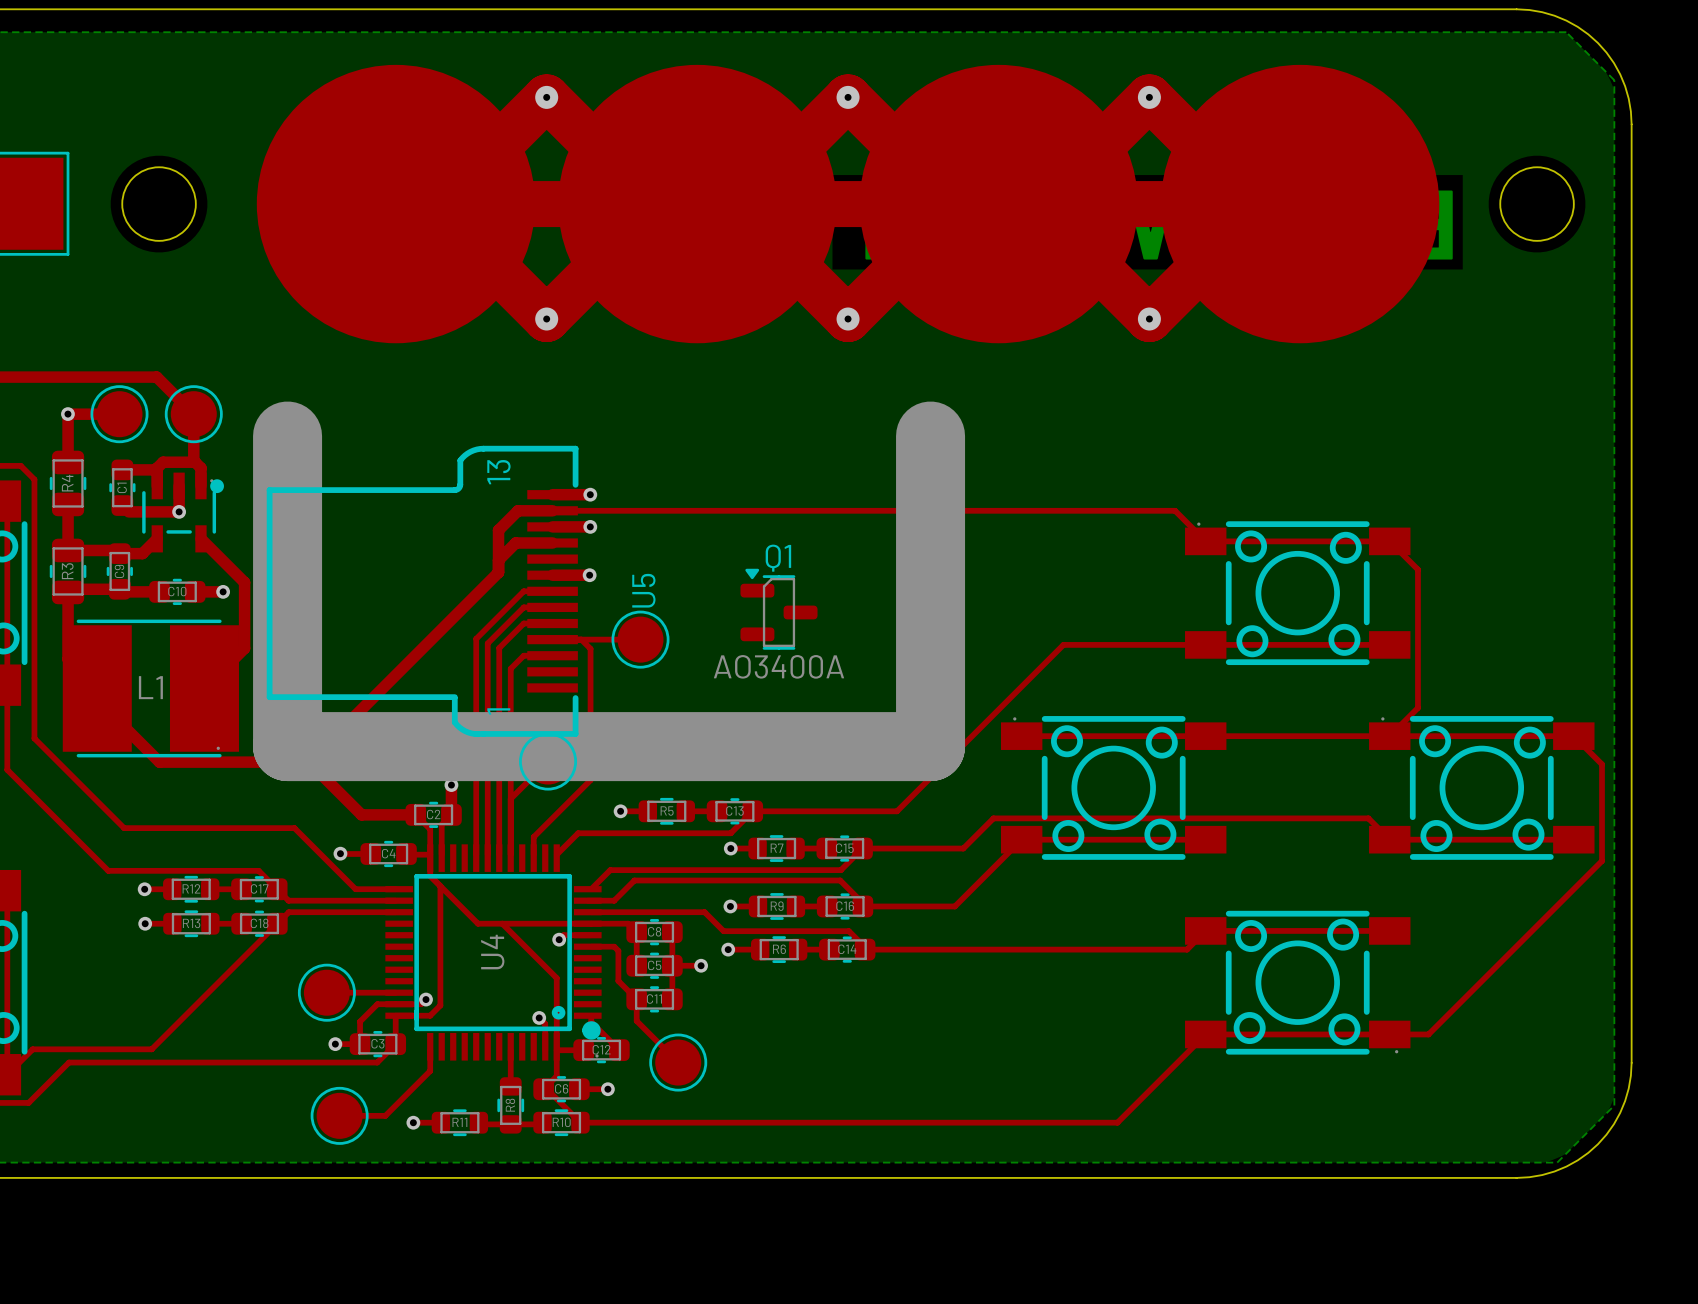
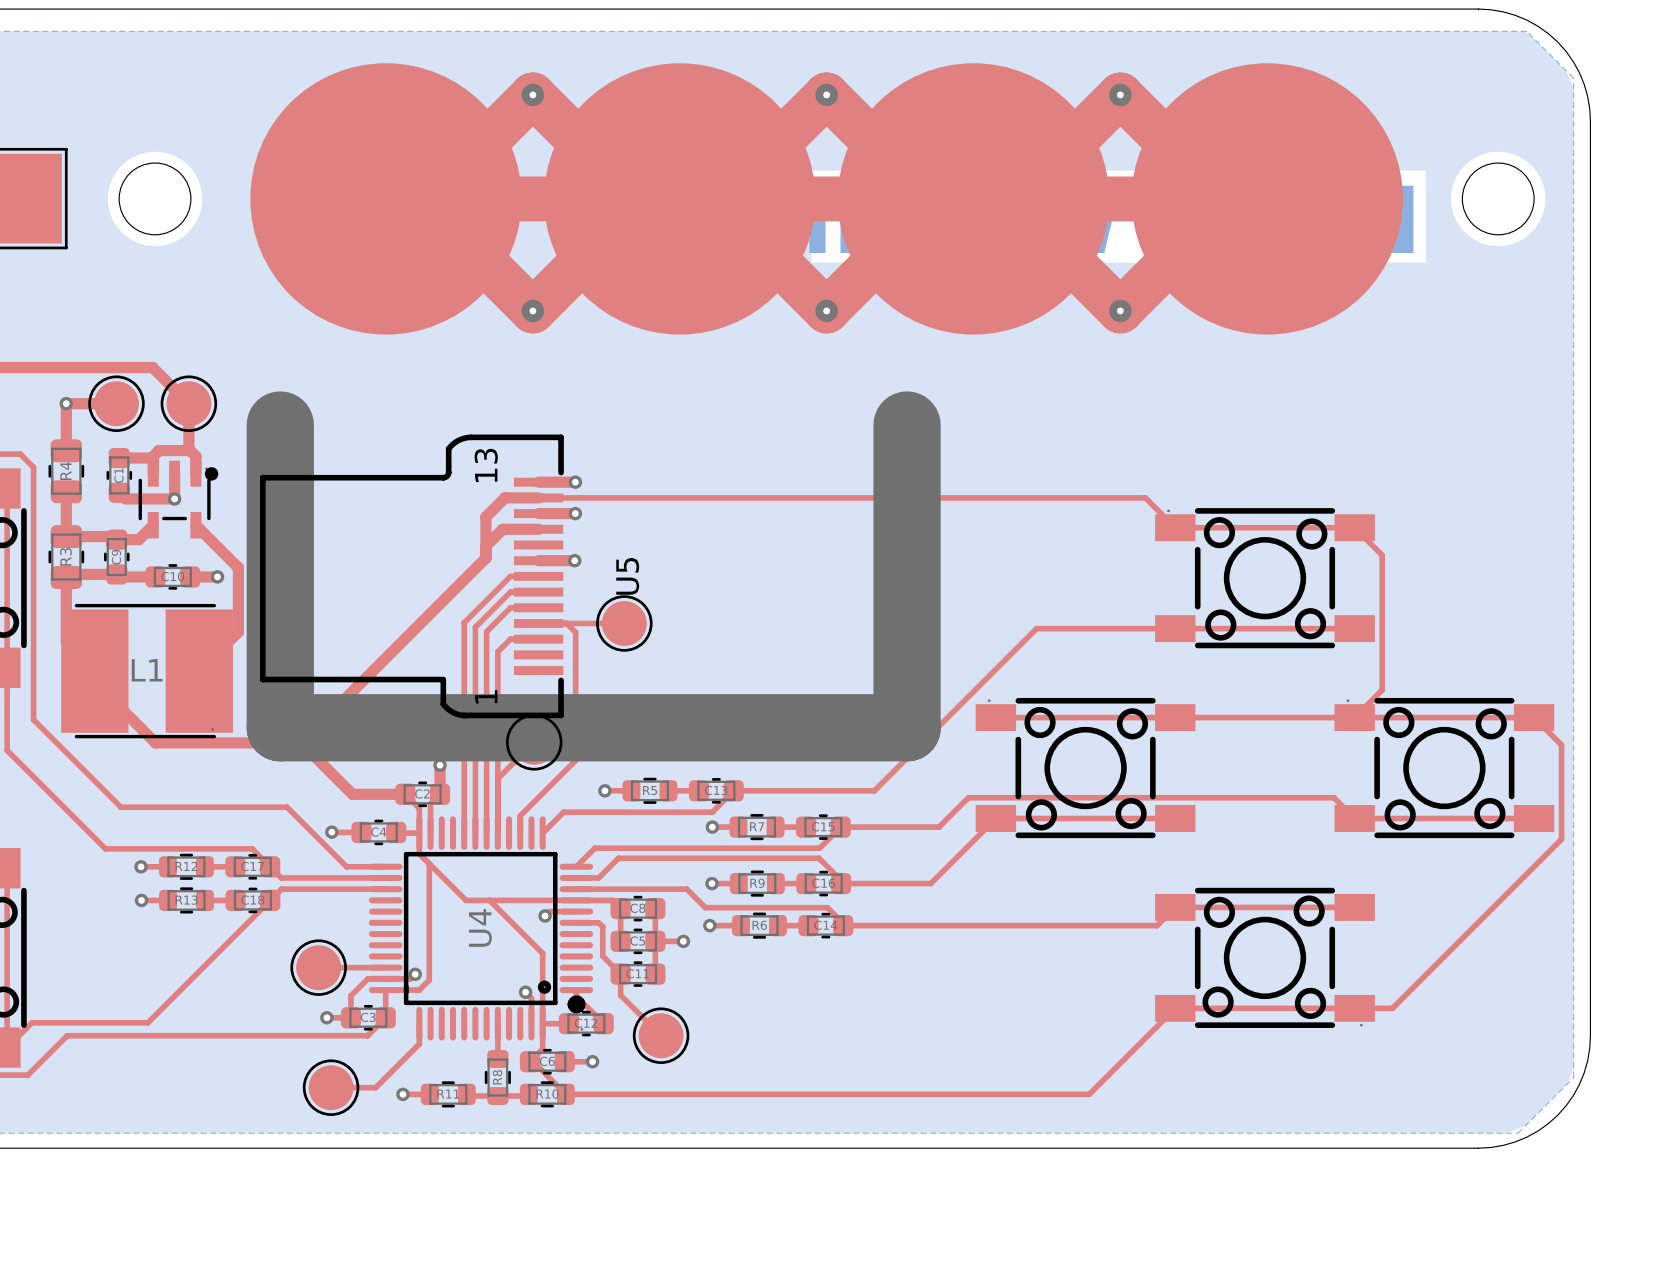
Q1: AO3400A (778, 609) -> none
U4 footprint: [385, 844, 602, 1061] -> [368, 816, 594, 1041]

